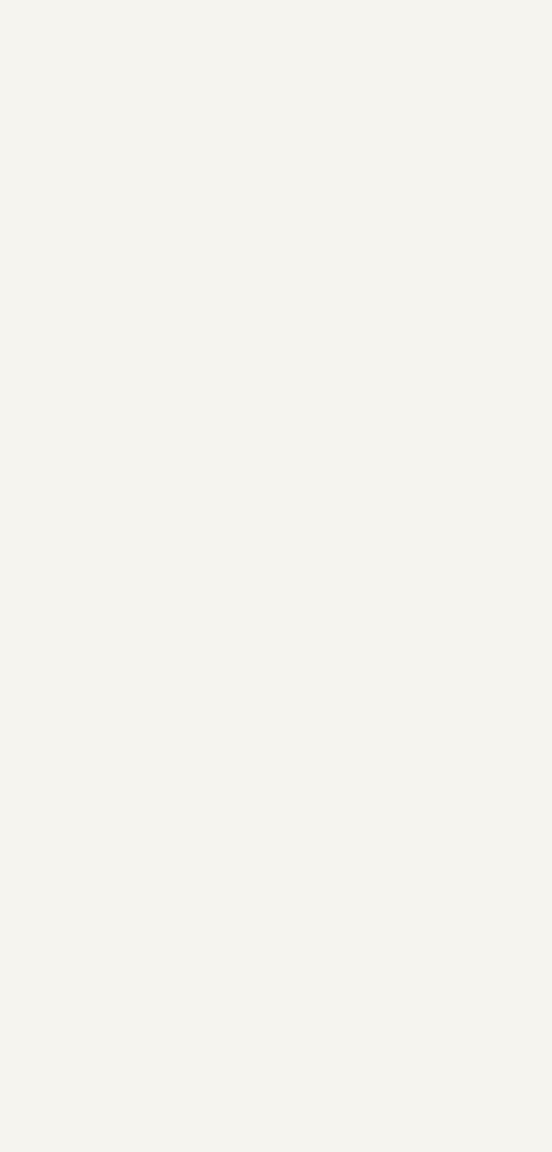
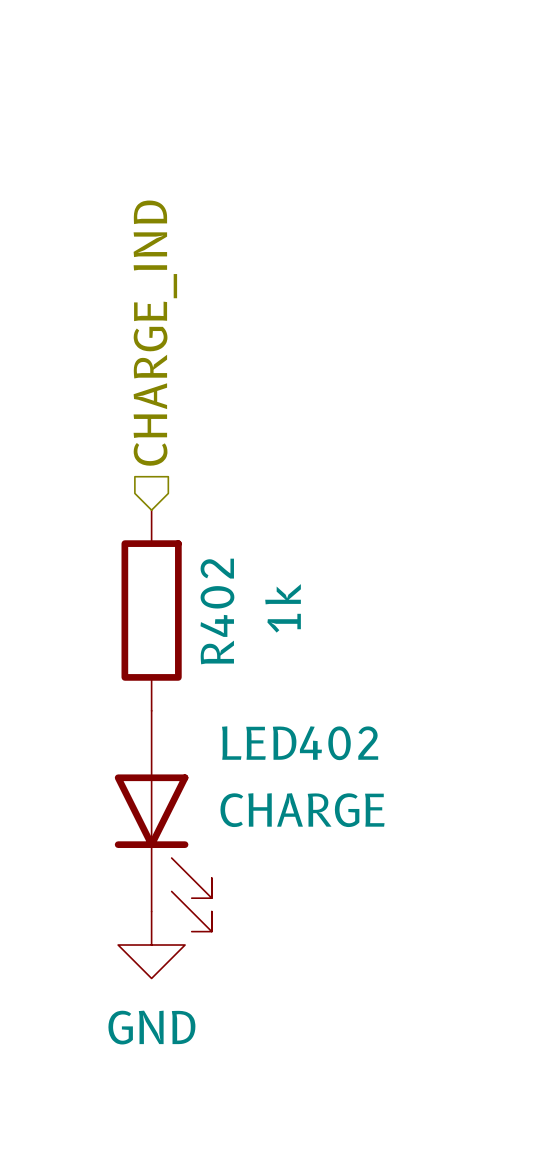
hierarchical label: none -> CHARGE_IND (155, 333)
R402: none -> 1k (151, 610)
LED402: none -> CHARGE (163, 821)
power symbol: none -> GND (151, 945)

